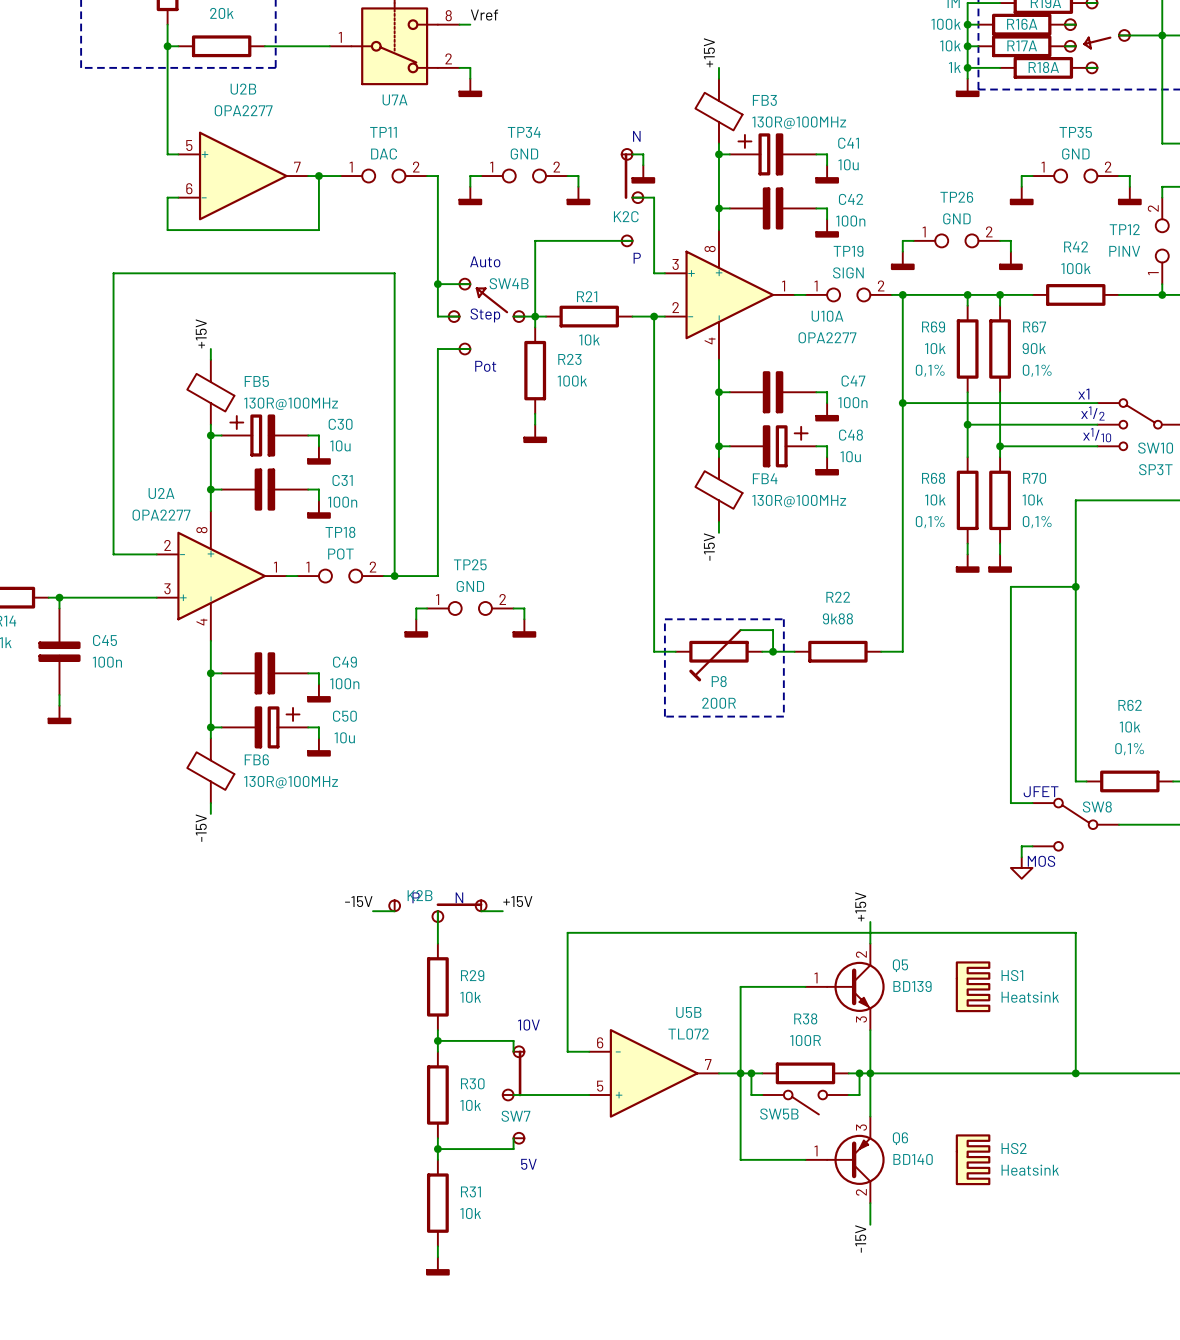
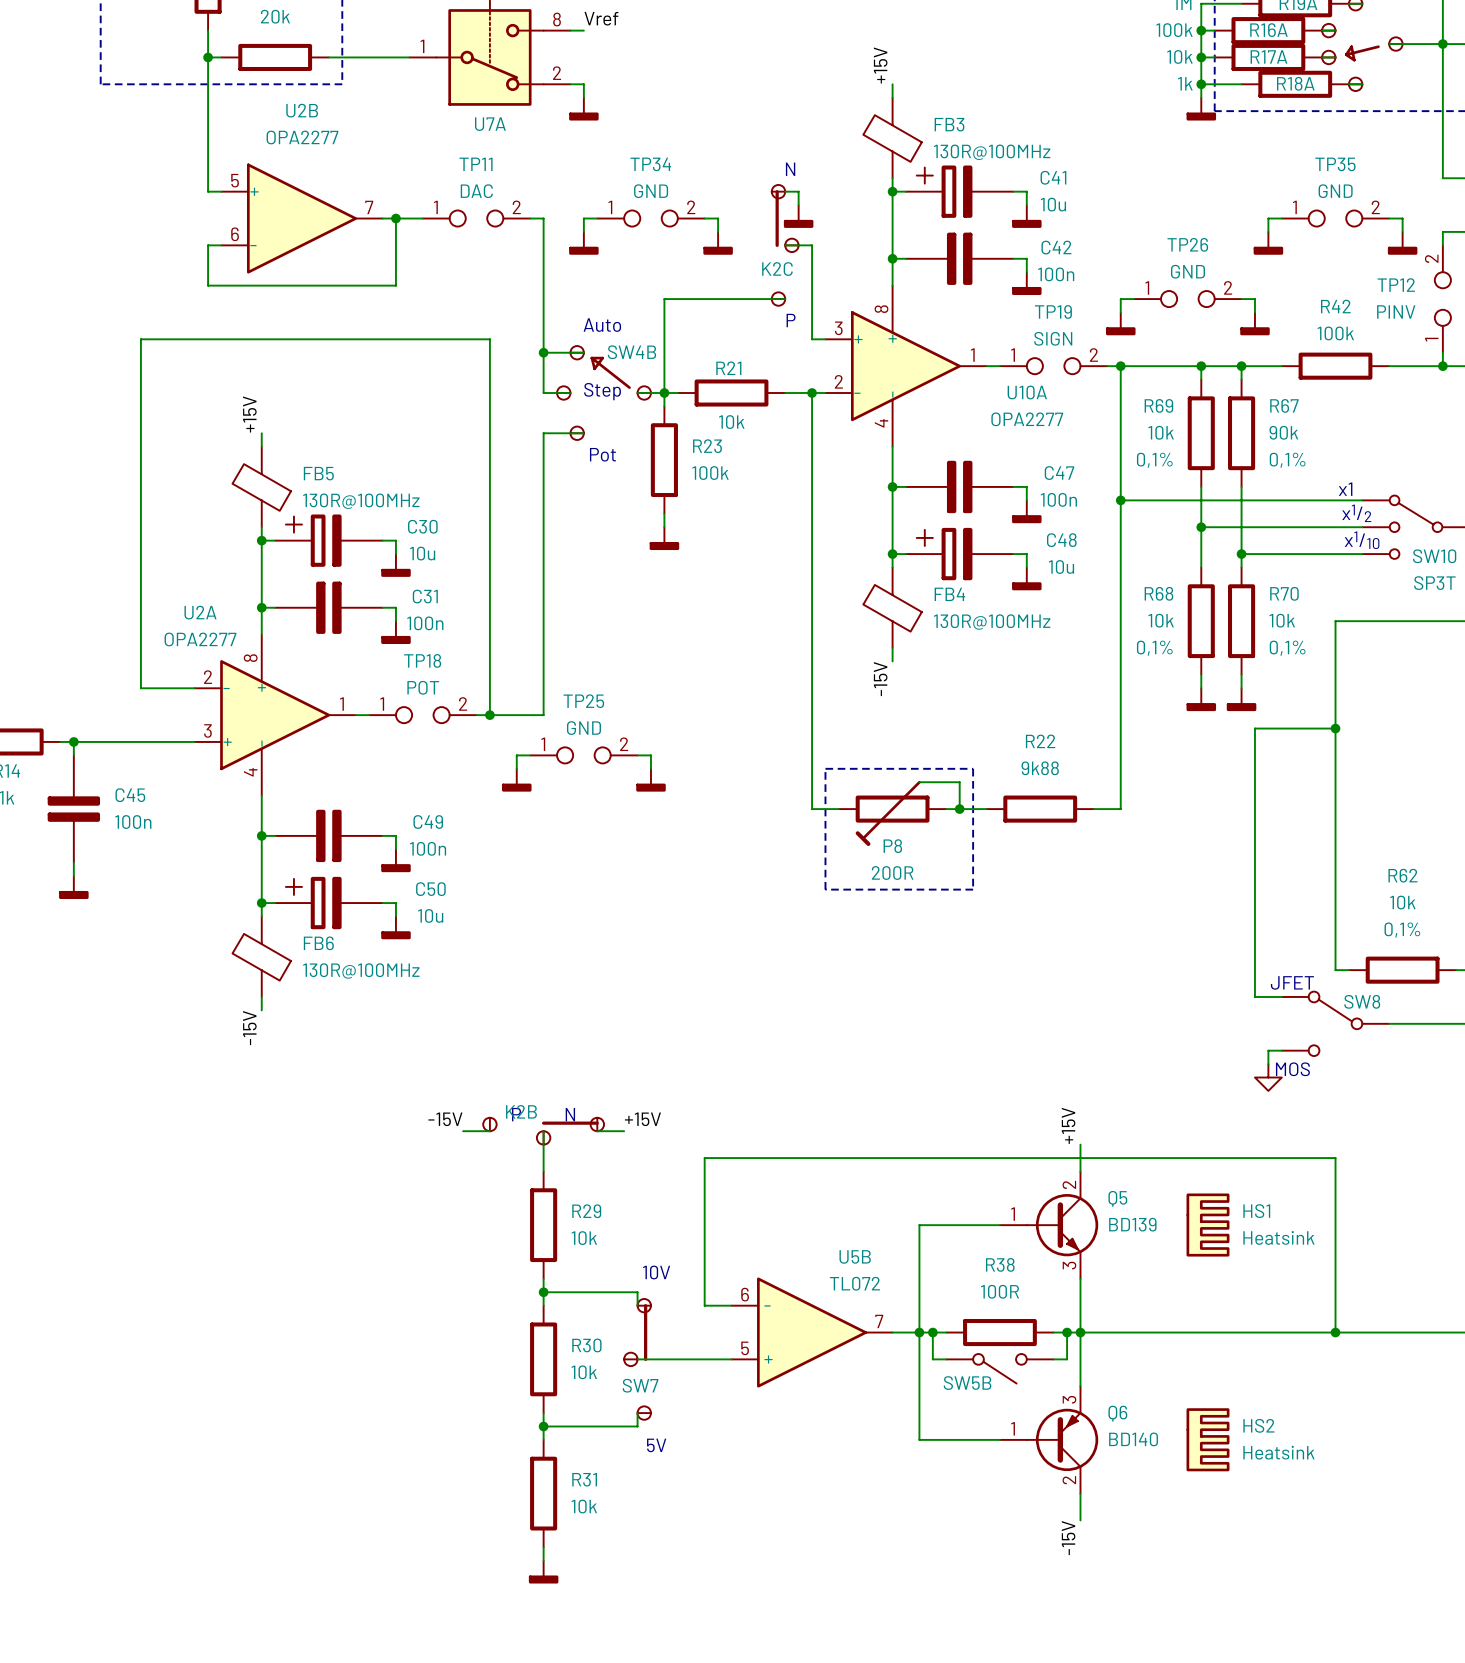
C48 flip: as is (785, 446) -> left-right (944, 554)
C50 flip: as is (277, 727) -> left-right (313, 903)

